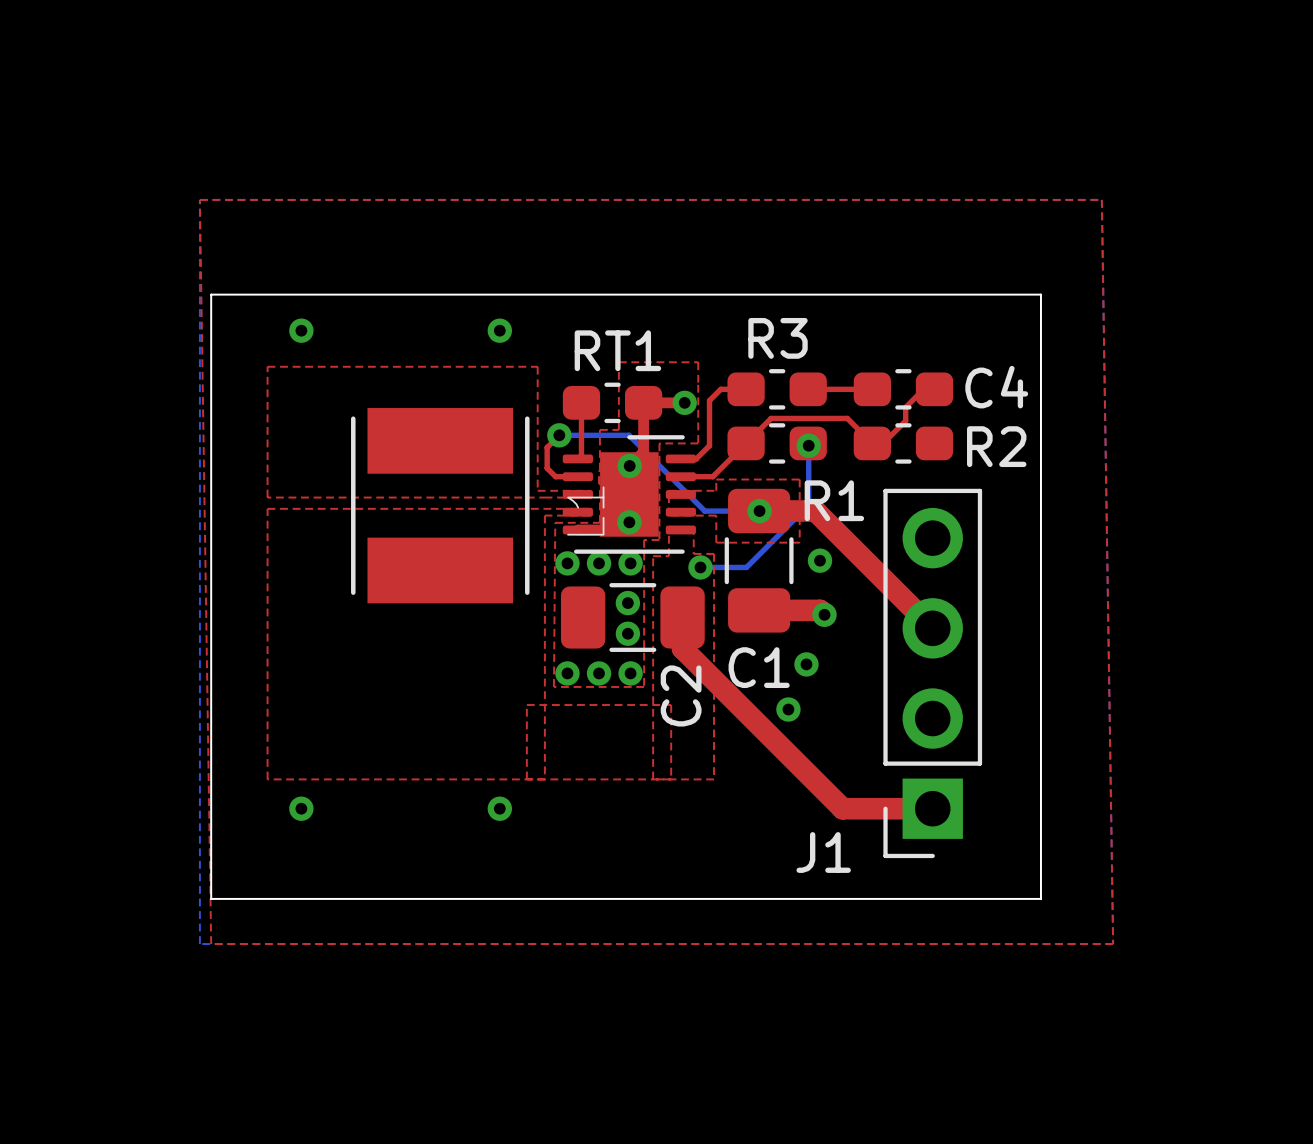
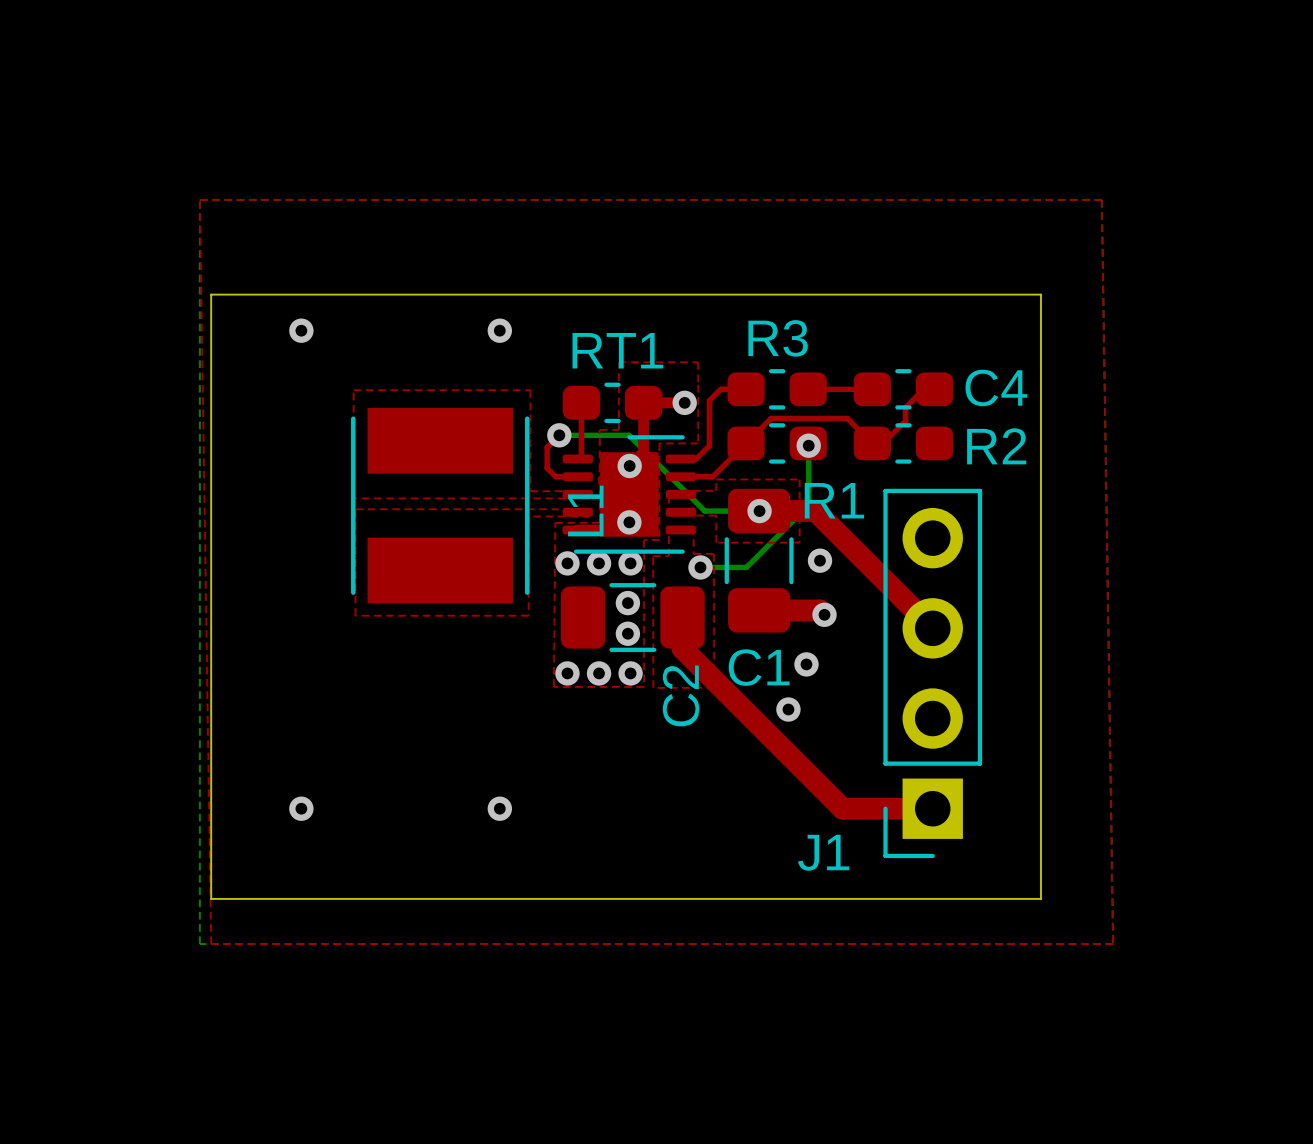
top zone outline: (590, 490) (537, 490) (537, 366) (267, 366) (267, 497) (590, 497) -> (590, 491) (530, 491) (530, 390) (353, 390) (353, 498) (590, 497)
top zone outline: (590, 508) (267, 508) (267, 779) (714, 779) (714, 553) -> (653, 556) (653, 687) (714, 687) (714, 553)
top zone outline: (590, 515) (544, 515) (544, 779) -> (590, 515) (528, 516) (528, 615) (355, 615) (355, 509) (590, 509)
top zone outline: (653, 556) (653, 779) -> none
top zone outline: (526, 779) (526, 705) (671, 705) (671, 779) -> none

